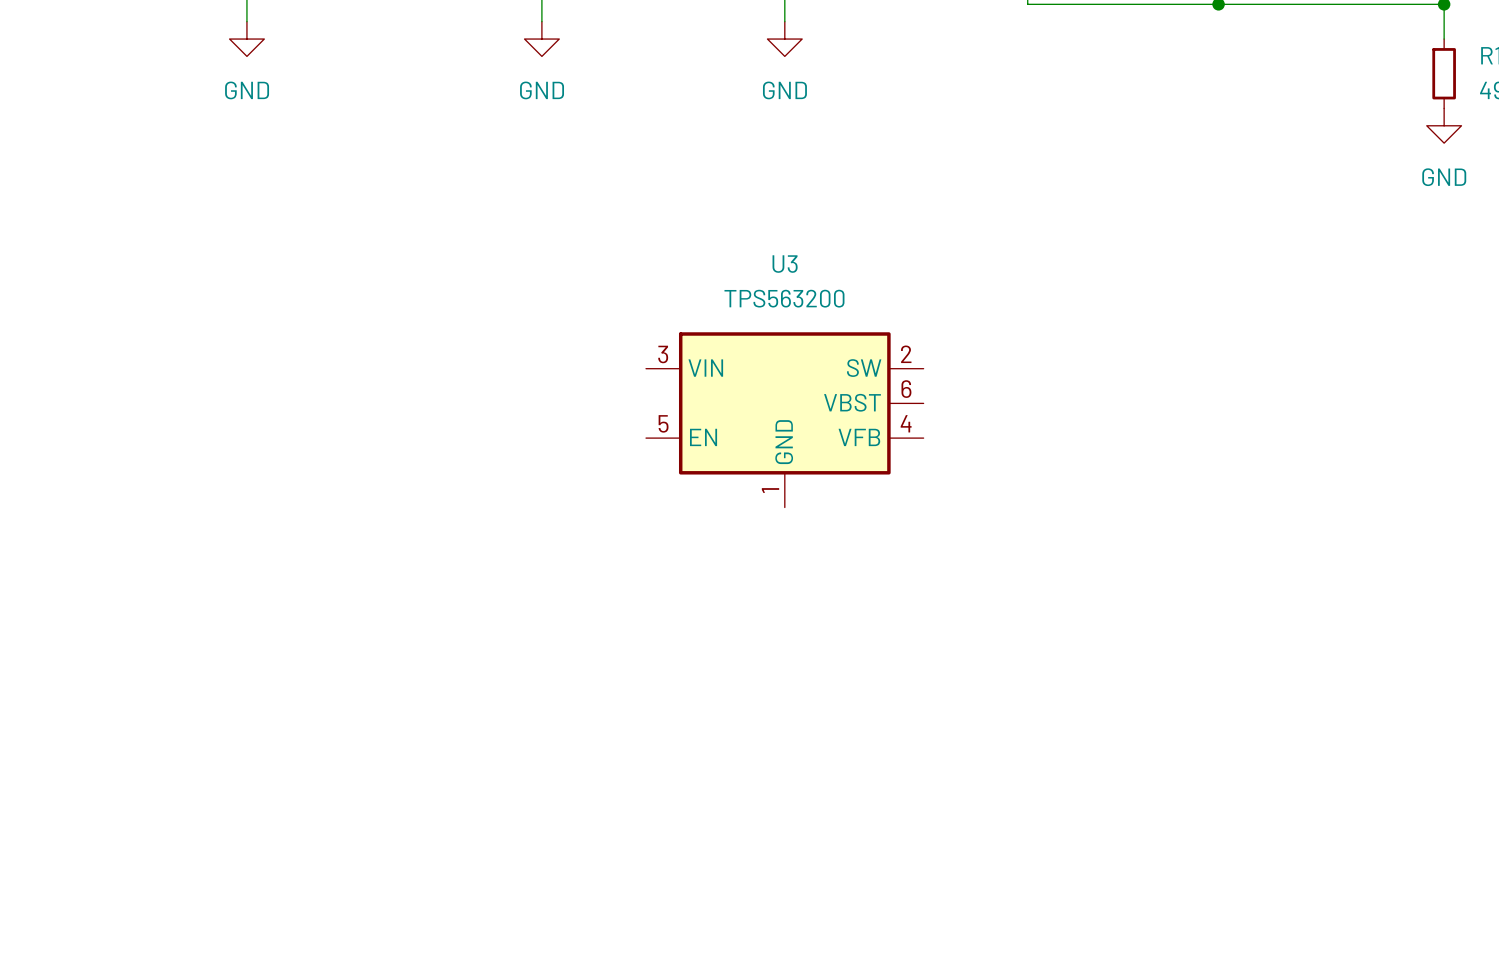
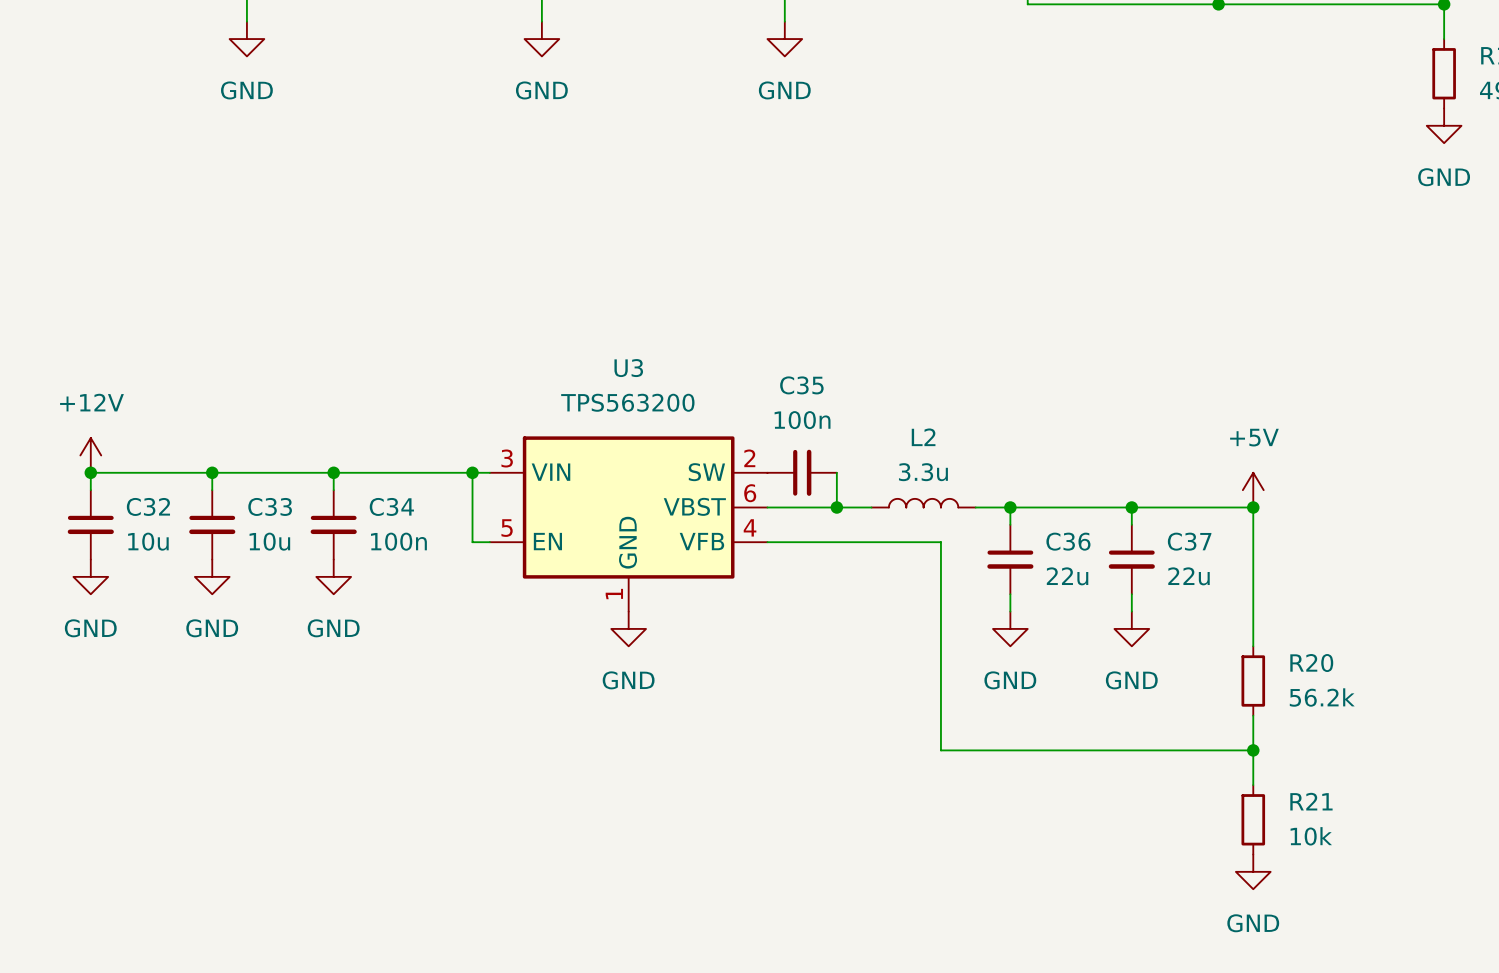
U3 position: (784, 419) -> (628, 523)
power symbol: none -> +12V (90, 455)
junction: none -> (90, 472)
wire: none -> (212, 472) (212, 490)
junction: none -> (212, 472)
wire: none -> (333, 472) (333, 490)
junction: none -> (333, 472)
wire: none -> (472, 472) (472, 542) (489, 542)
junction: none -> (472, 472)
wire: none -> (489, 472) (90, 472) (90, 490)
C35: none -> 100n (802, 472)
wire: none -> (836, 472) (836, 507)
power symbol: none -> +5V (1253, 490)
L2: none -> 3.3u (923, 503)
wire: none -> (767, 507) (871, 507)
junction: none -> (836, 507)
wire: none -> (975, 507) (1253, 507) (1253, 646)
wire: none -> (1010, 507) (1010, 524)
junction: none -> (1010, 507)
wire: none -> (1131, 507) (1131, 524)
junction: none -> (1131, 507)
junction: none -> (1253, 507)
C32: none -> 10u (90, 524)
C33: none -> 10u (212, 524)
C34: none -> 100n (333, 524)
wire: none -> (767, 542) (940, 542) (940, 750) (1253, 750)
C36: none -> 22u (1010, 559)
C37: none -> 22u (1131, 559)
power symbol: none -> GND (90, 576)
power symbol: none -> GND (212, 576)
power symbol: none -> GND (333, 576)
wire: none -> (1010, 594) (1010, 611)
wire: none -> (1131, 594) (1131, 611)
power symbol: none -> GND (628, 628)
power symbol: none -> GND (1010, 628)
power symbol: none -> GND (1131, 628)
R20: none -> 56.2k (1253, 681)
wire: none -> (1253, 715) (1253, 785)
junction: none -> (1253, 750)
R21: none -> 10k (1253, 819)
power symbol: none -> GND (1253, 871)

